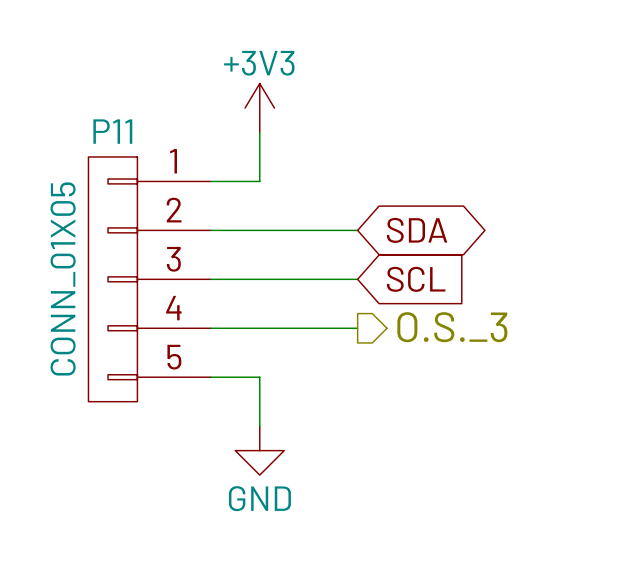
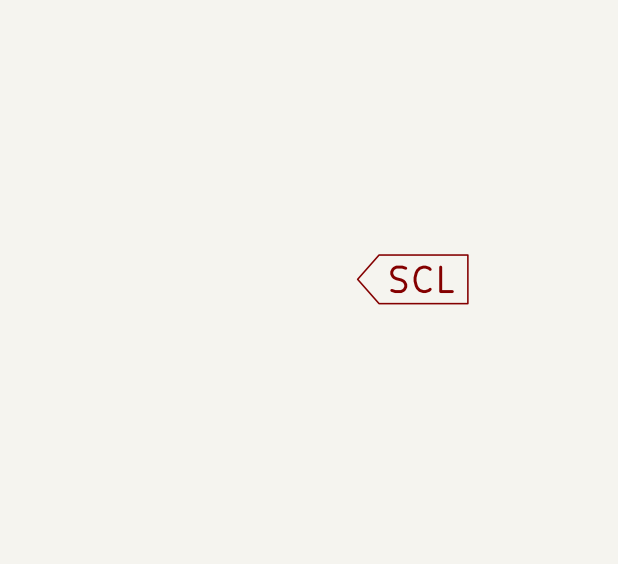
power symbol: +3V3 (259, 108) -> none
wire: (259, 132) (259, 181) (210, 181) -> none
wire: (210, 230) (357, 230) -> none
global label: SDA (417, 230) -> none
P11: CONN_01X05 (149, 279) -> none
wire: (210, 279) (357, 279) -> none
hierarchical label: O.S._3 (452, 327) -> none
wire: (210, 328) (357, 328) -> none
wire: (210, 377) (259, 377) (259, 426) -> none
power symbol: GND (259, 450) -> none

